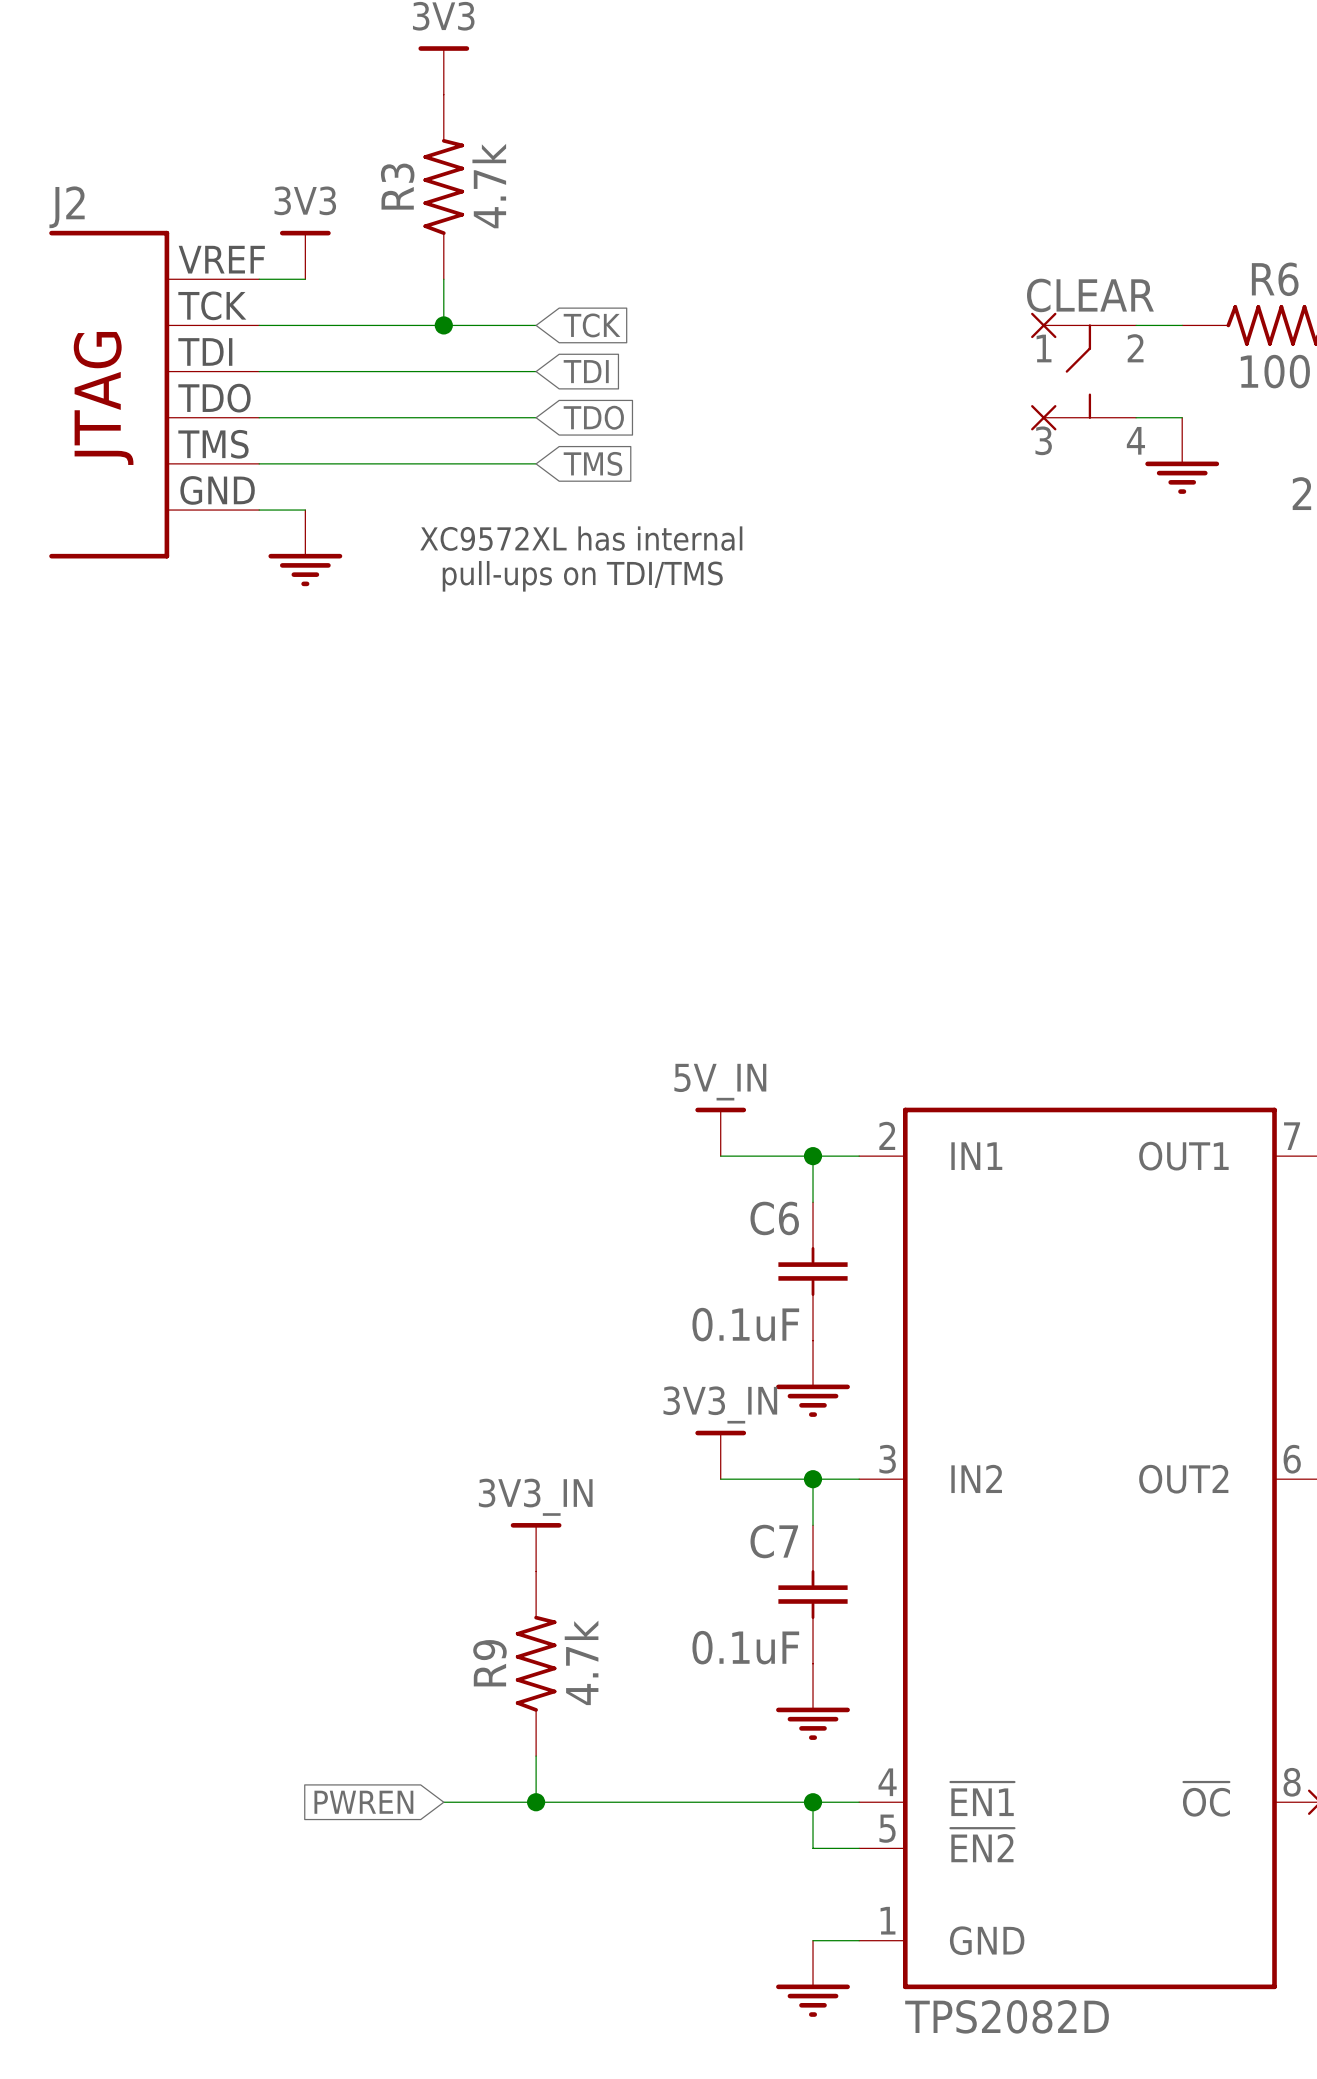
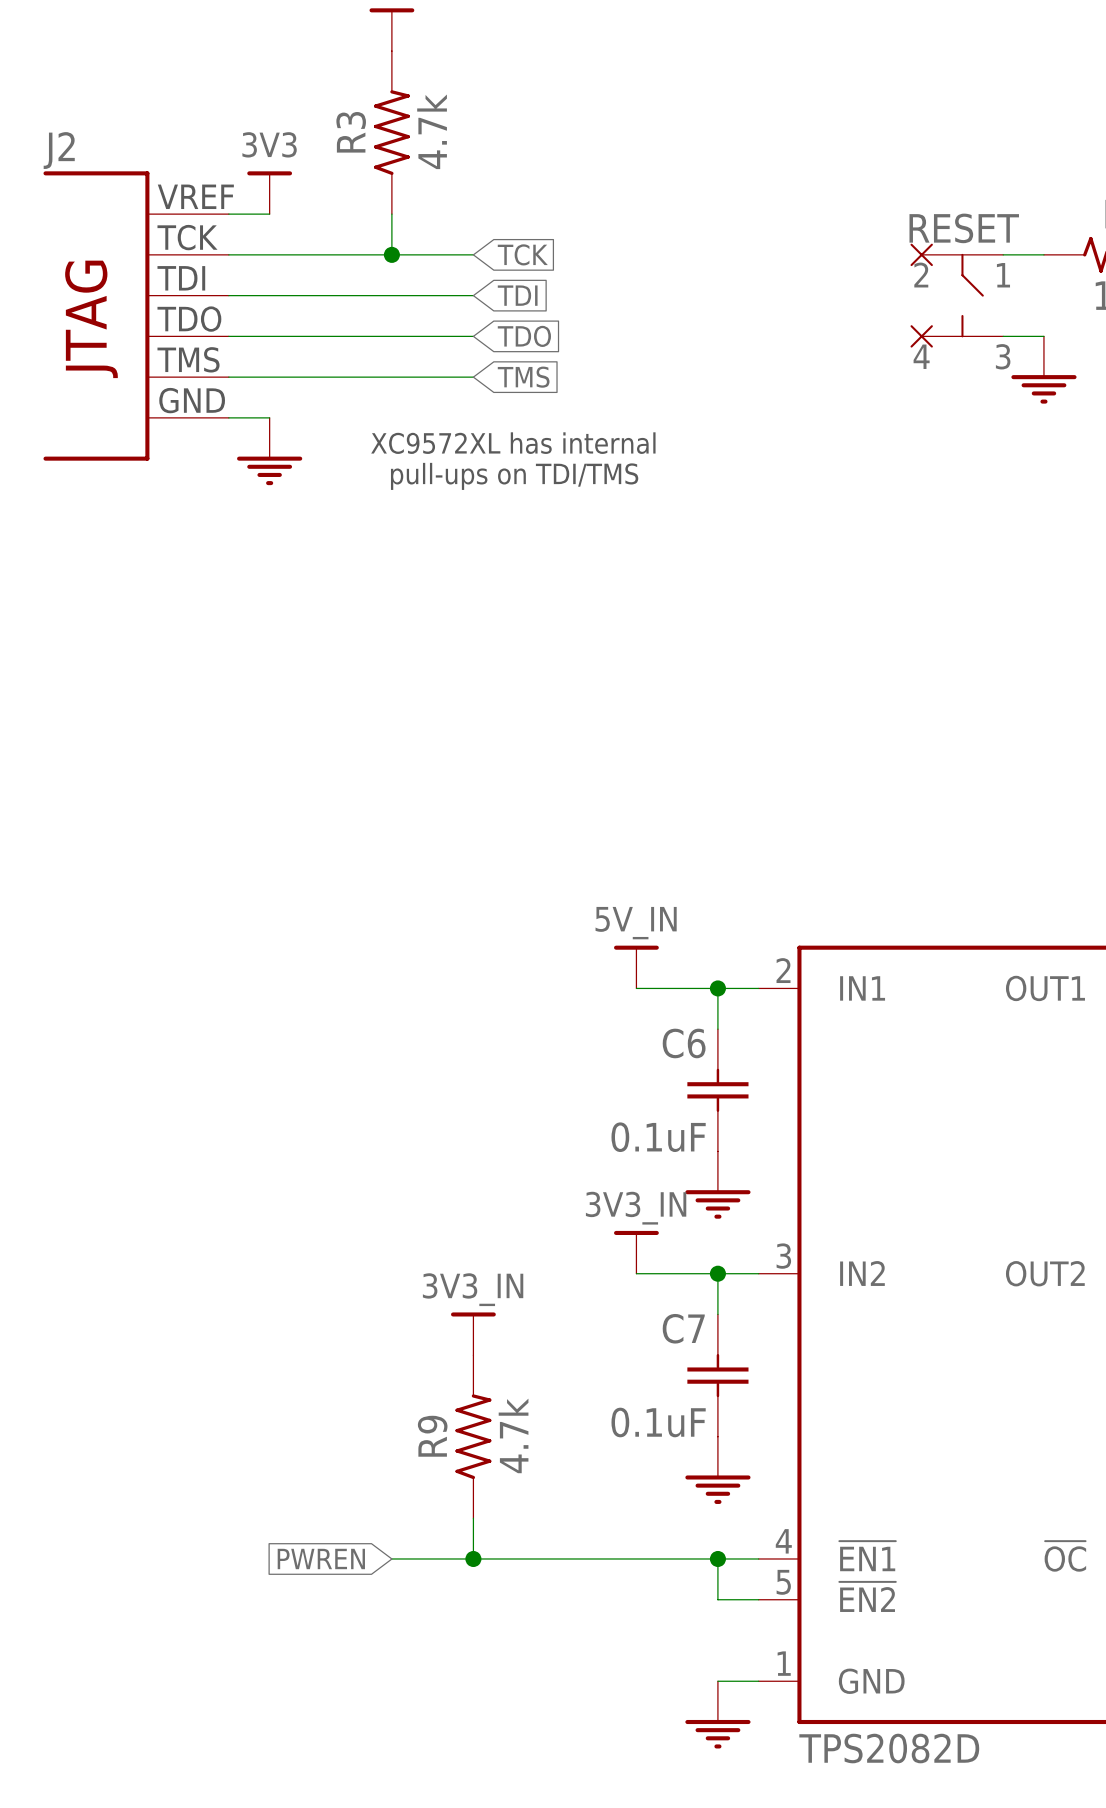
CLEAR: (1089, 371) -> none
RESET: none -> (962, 295)

